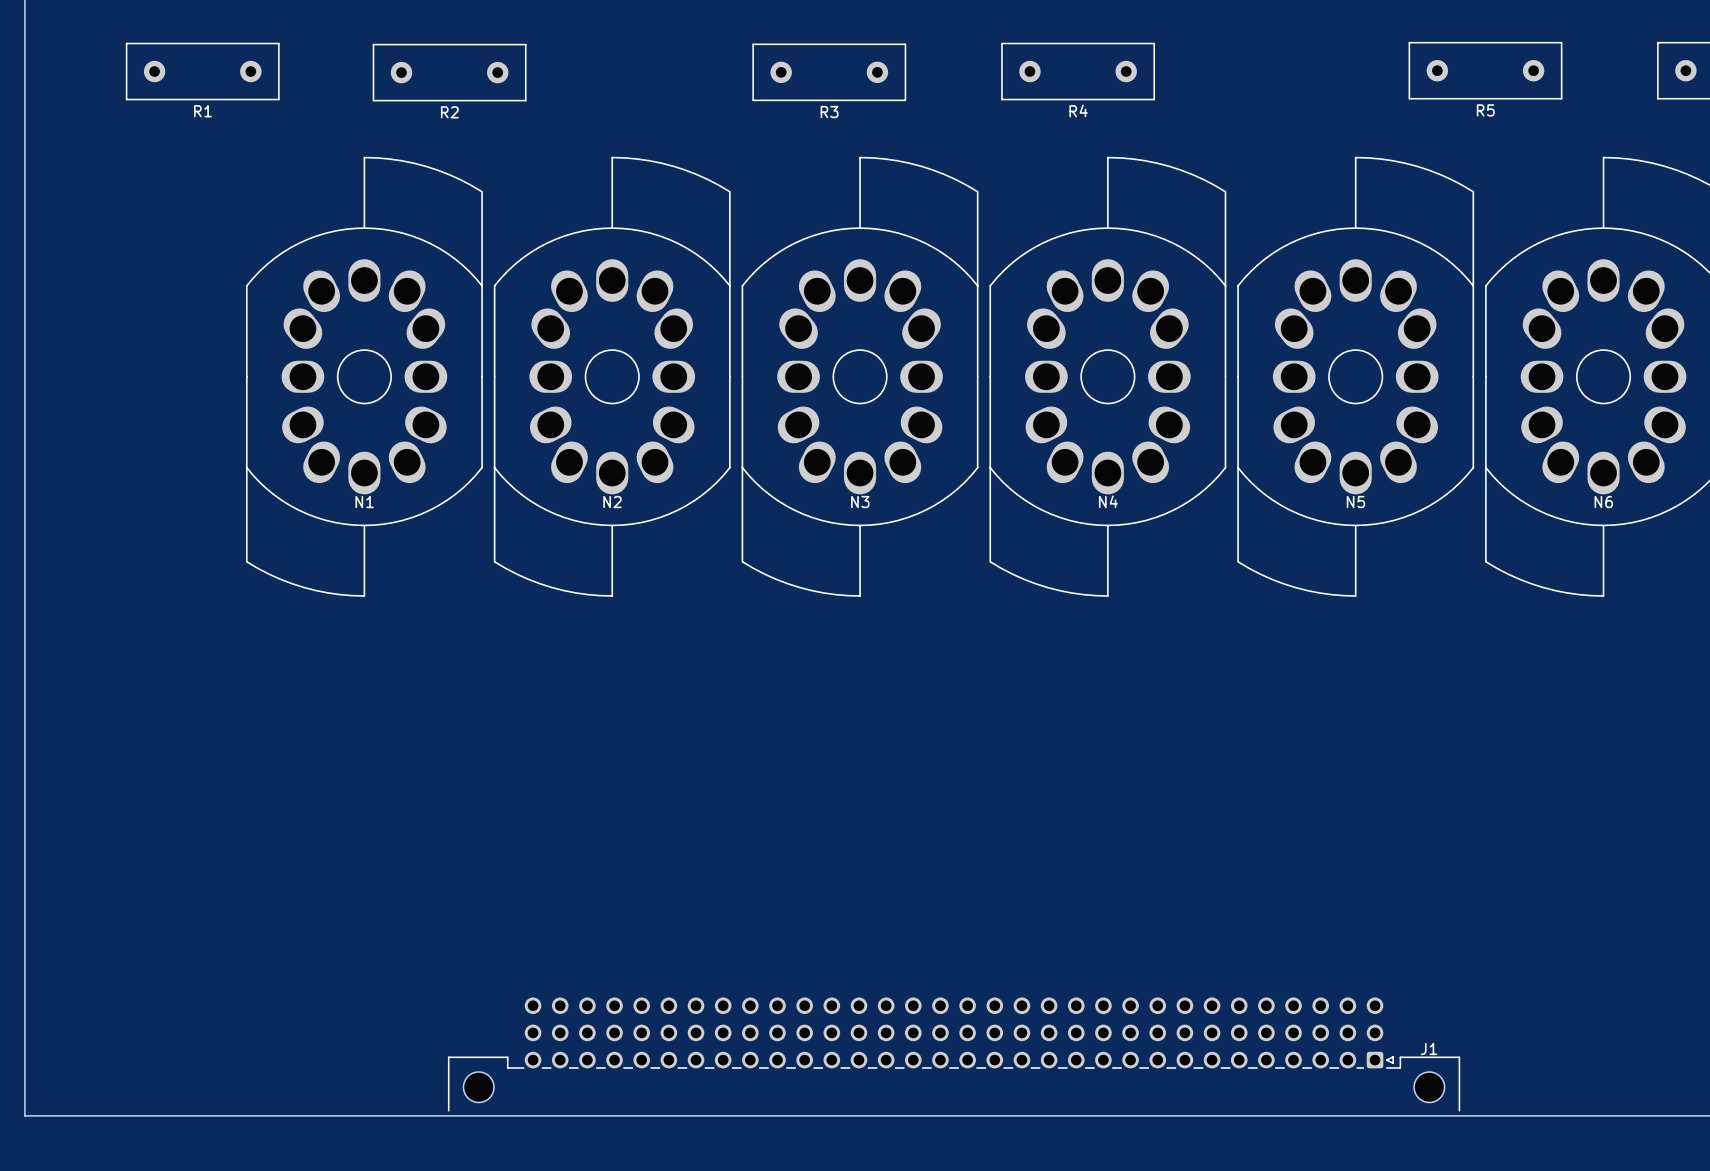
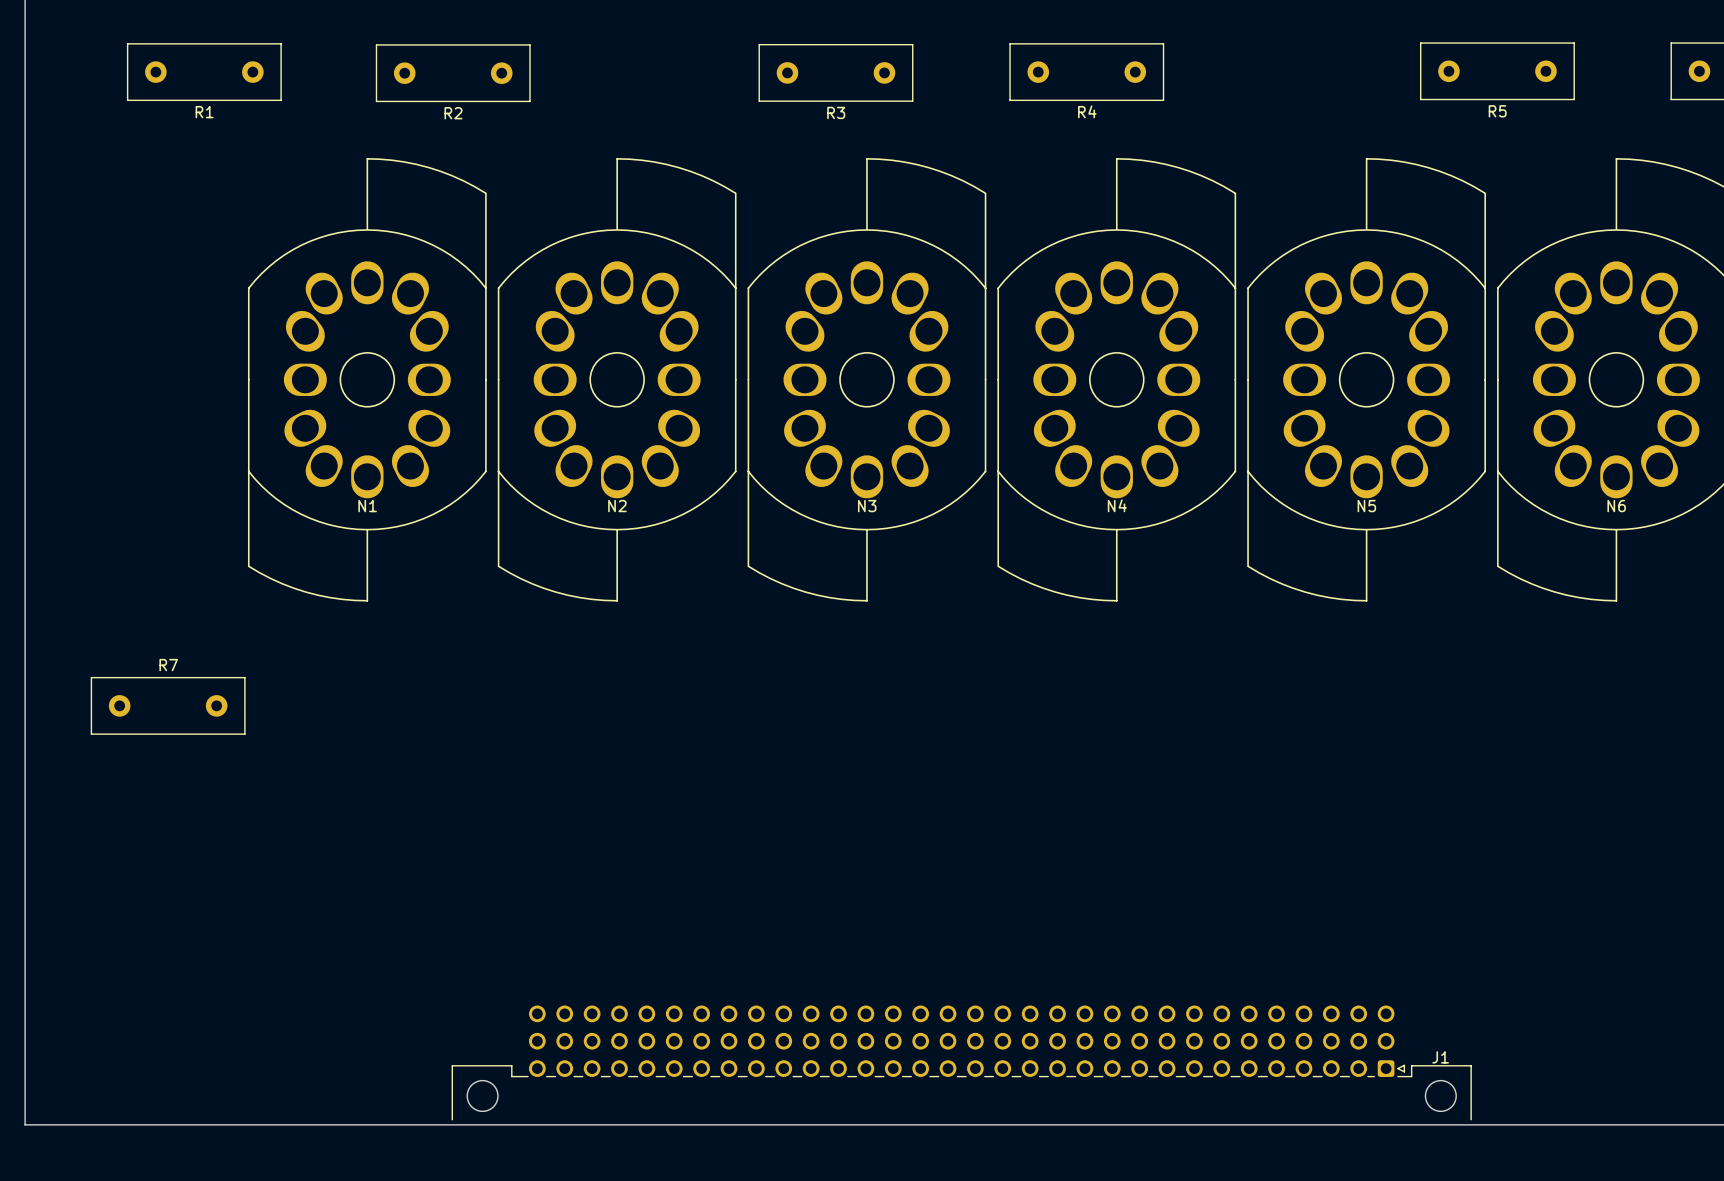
R7: none -> (168, 705)

